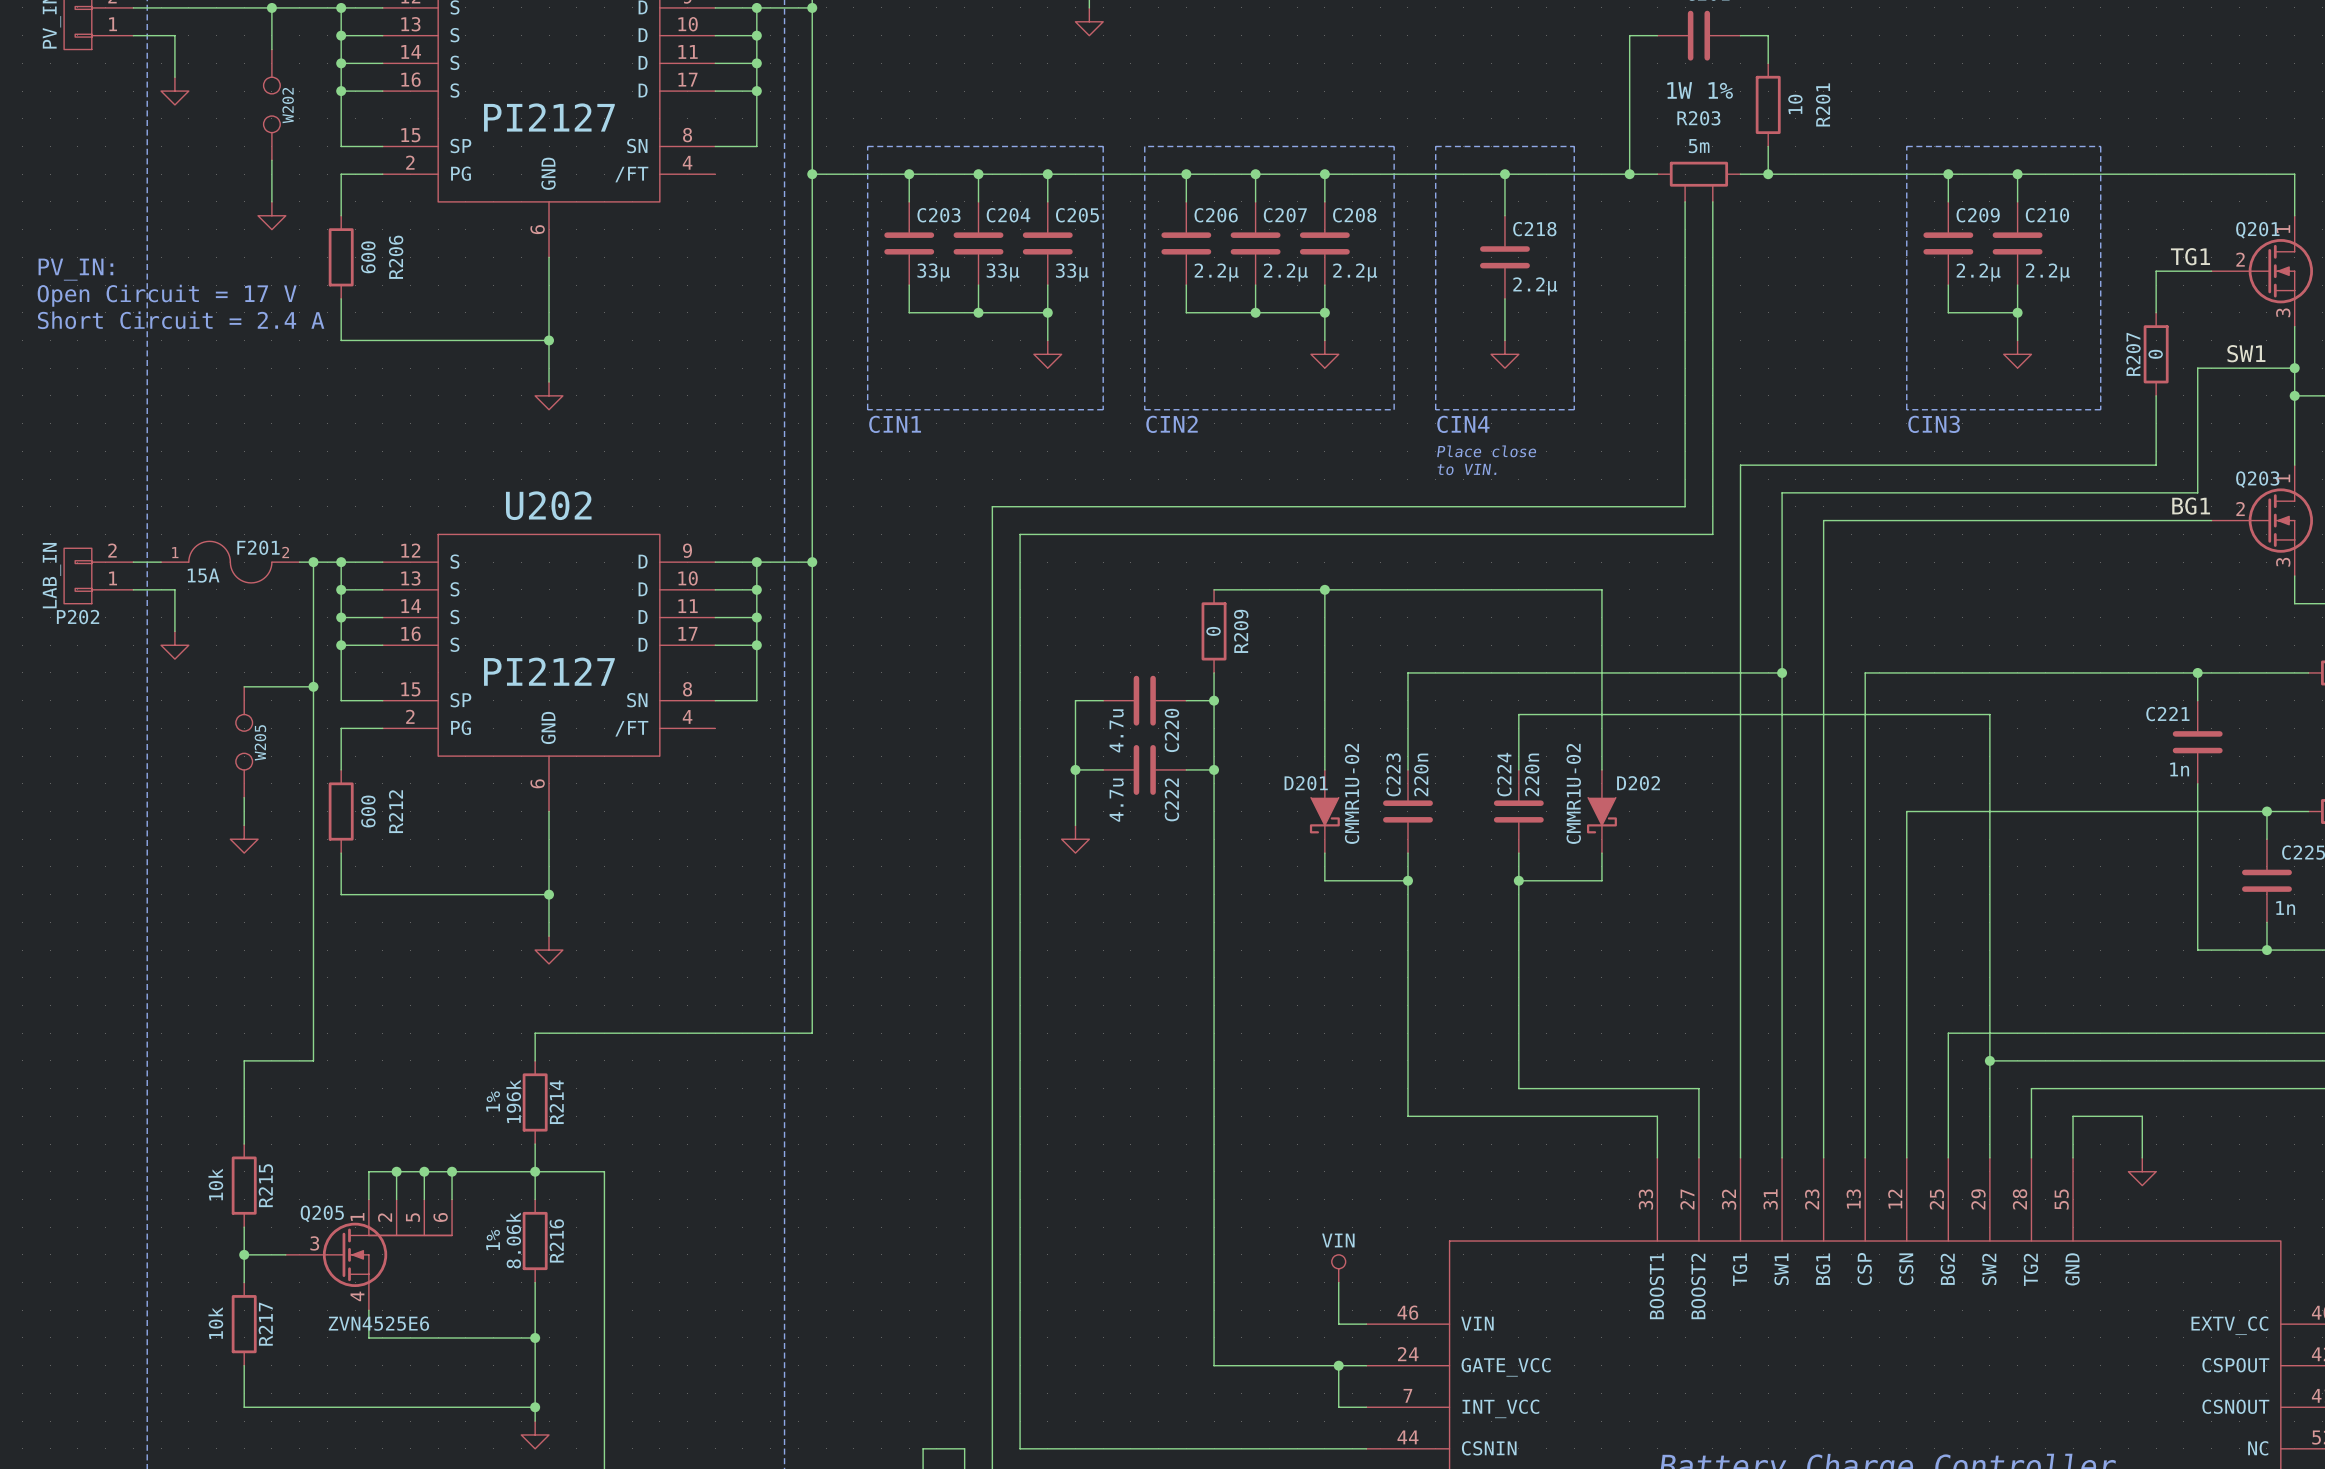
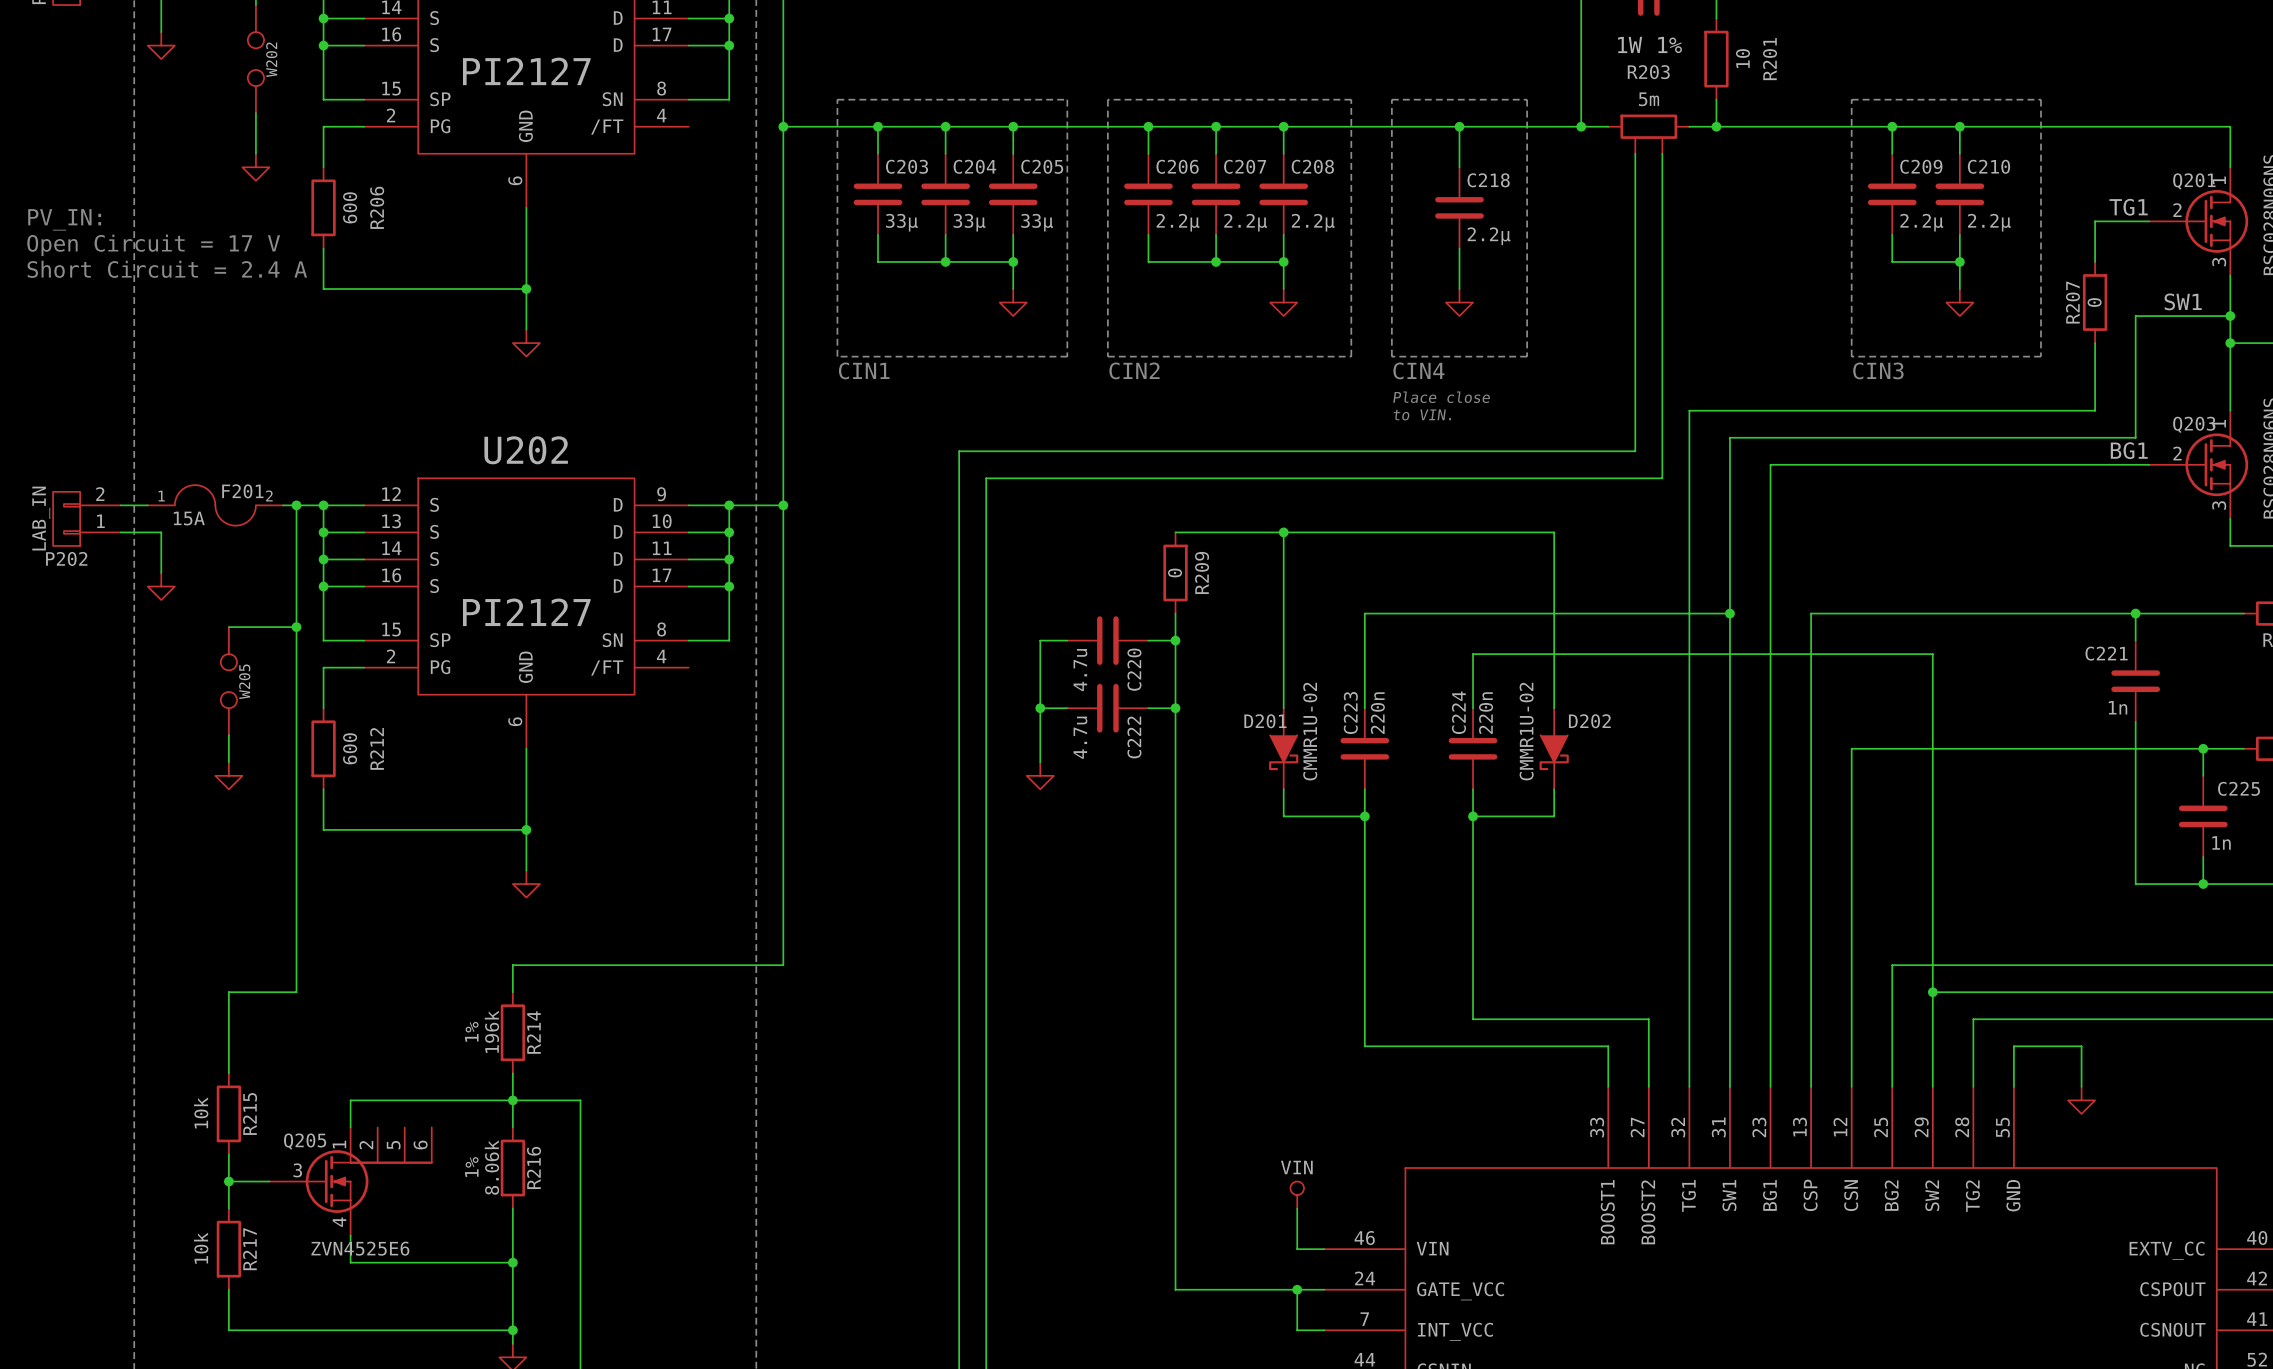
wire: (396, 1171) (396, 1199) -> none
junction: (396, 1171) -> none
wire: (424, 1171) (424, 1199) -> none
junction: (424, 1171) -> none
wire: (452, 1171) (452, 1199) -> none
junction: (452, 1171) -> none

